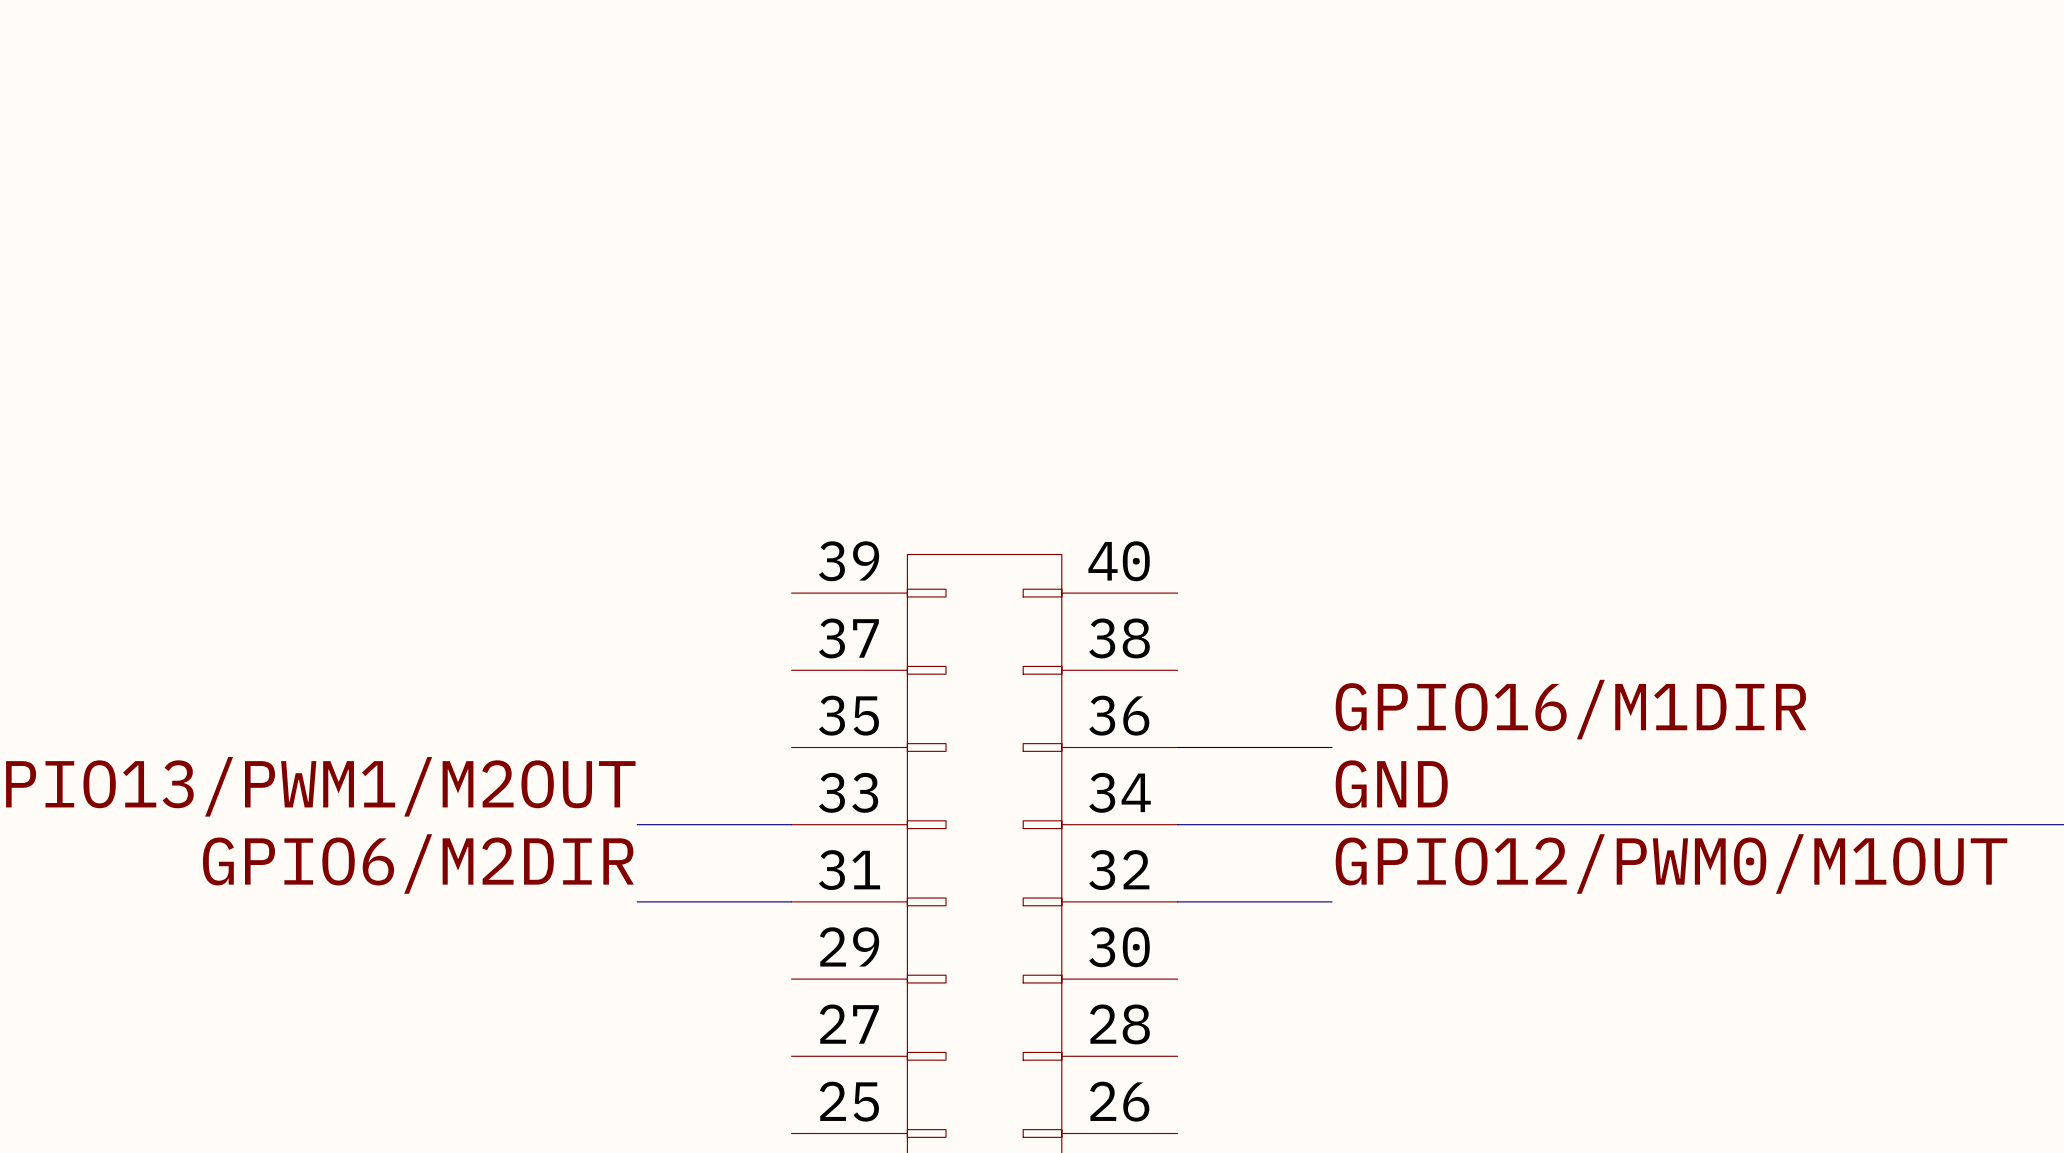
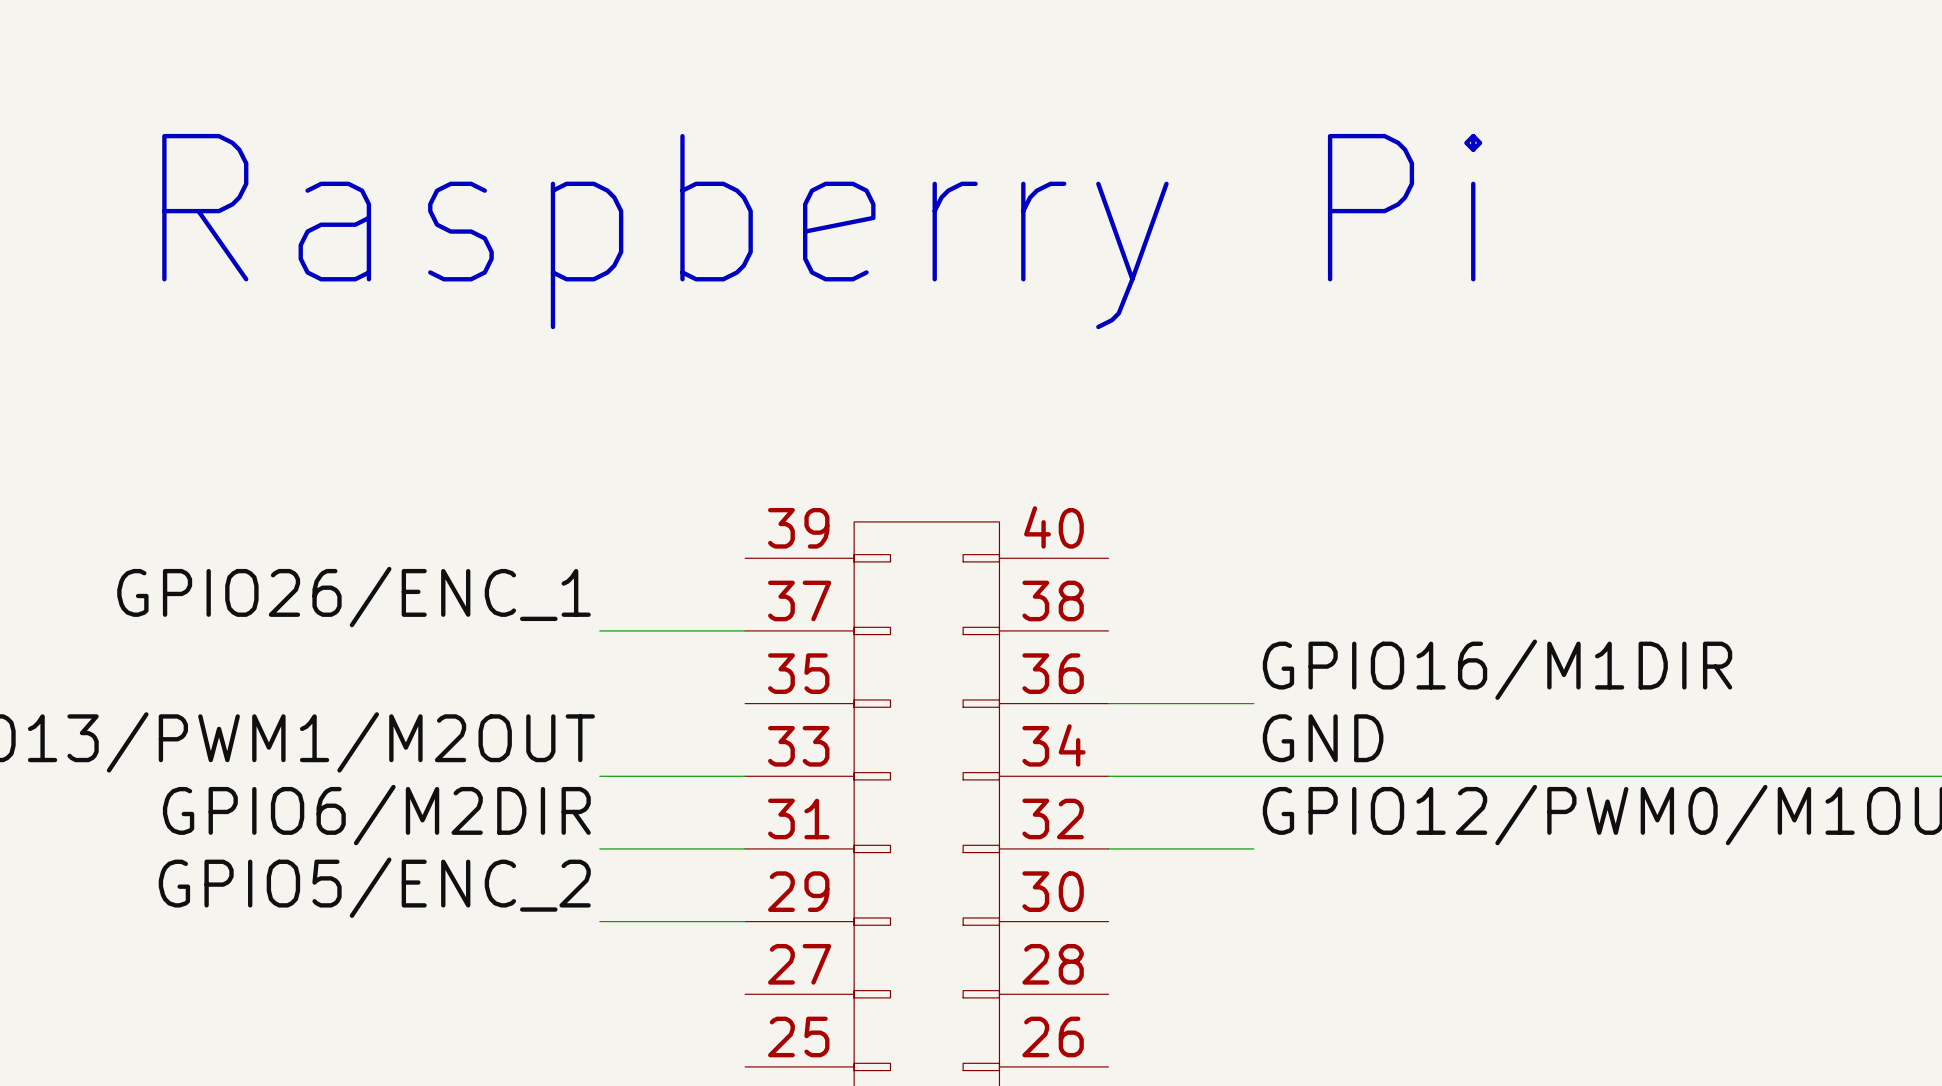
text: none -> Raspberry Pi (822, 231)
label: none -> GPIO26/ENC_1 (354, 597)
wire: none -> (599, 630) (745, 630)
label: none -> GPIO5/ENC_2 (374, 887)
wire: none -> (599, 921) (745, 921)

